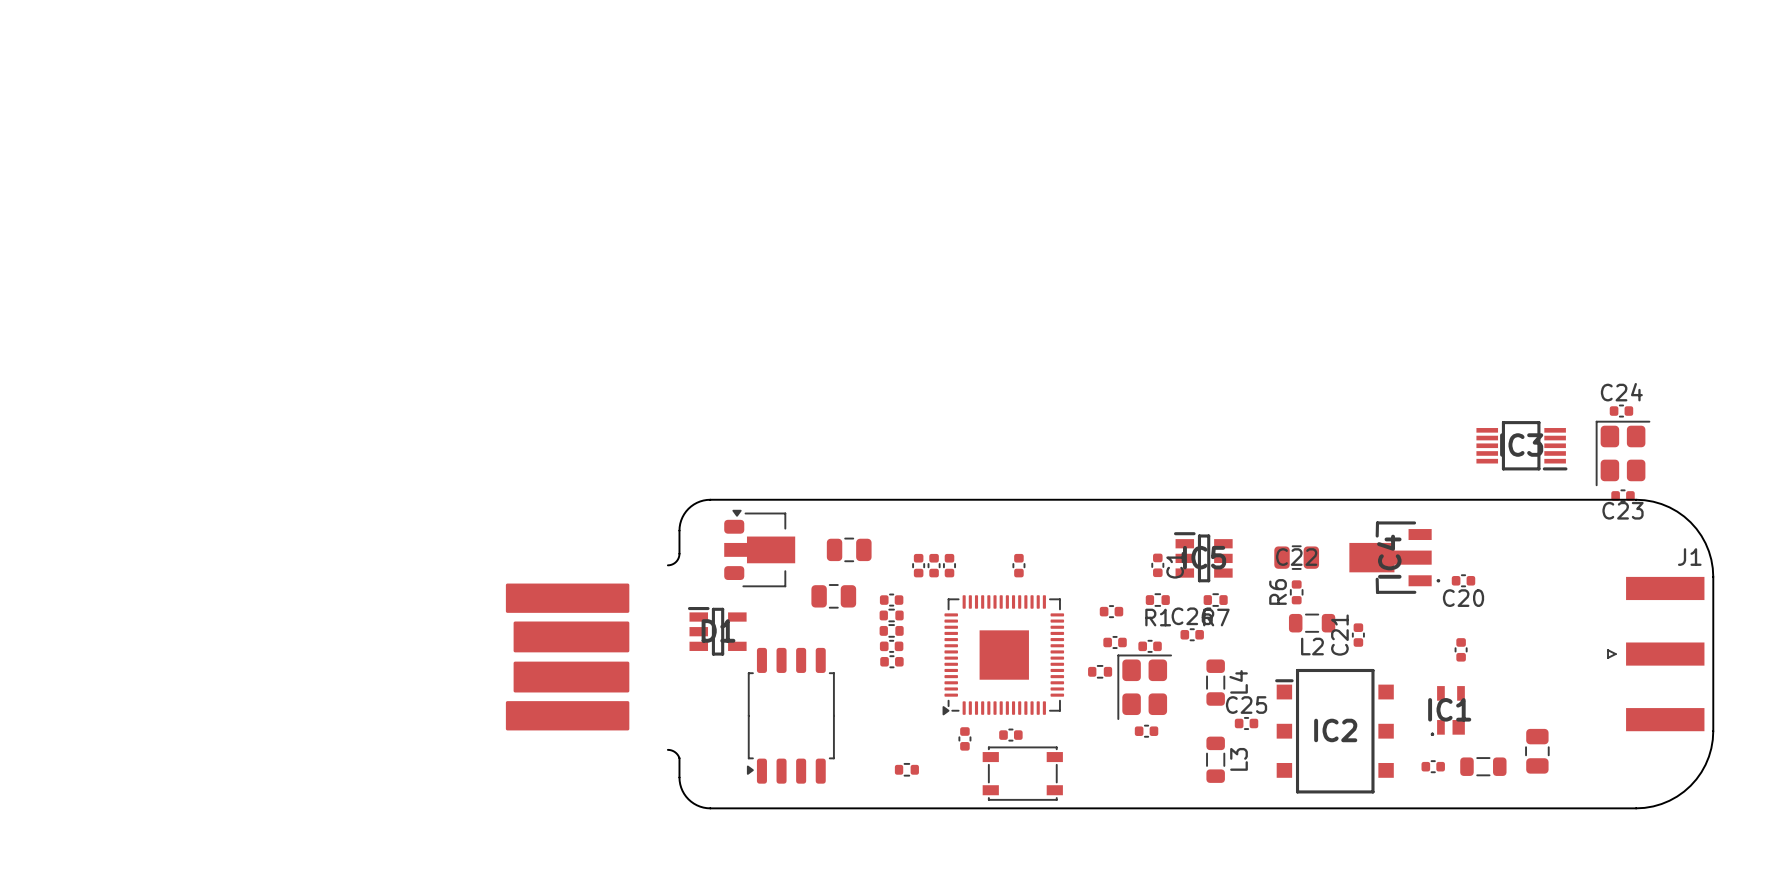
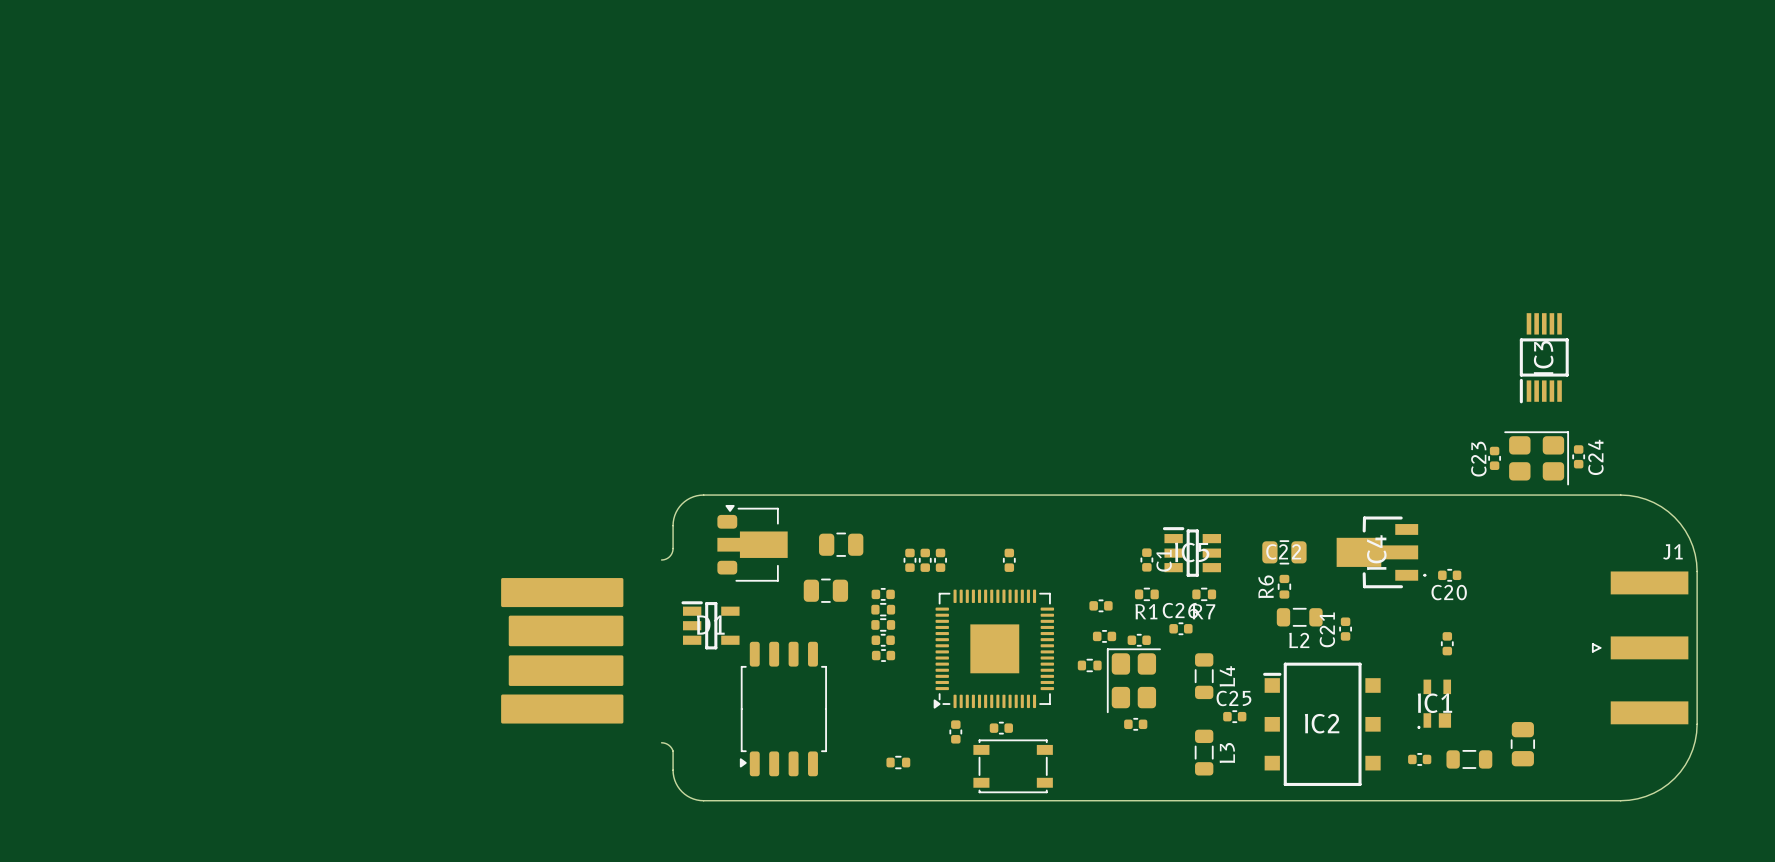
C24 rotation: 0° (1621, 411) -> 90° clockwise (1578, 456)
C24 position: (1621, 411) -> (1578, 456)
IC3 rotation: 0° (1521, 445) -> 90° clockwise (1544, 358)
IC3 position: (1521, 445) -> (1544, 358)
part rotation: 0° (1623, 453) -> 90° clockwise (1536, 458)
part position: (1623, 453) -> (1536, 458)
C23 rotation: 0° (1623, 495) -> 90° clockwise (1494, 458)
C23 position: (1623, 495) -> (1494, 458)

